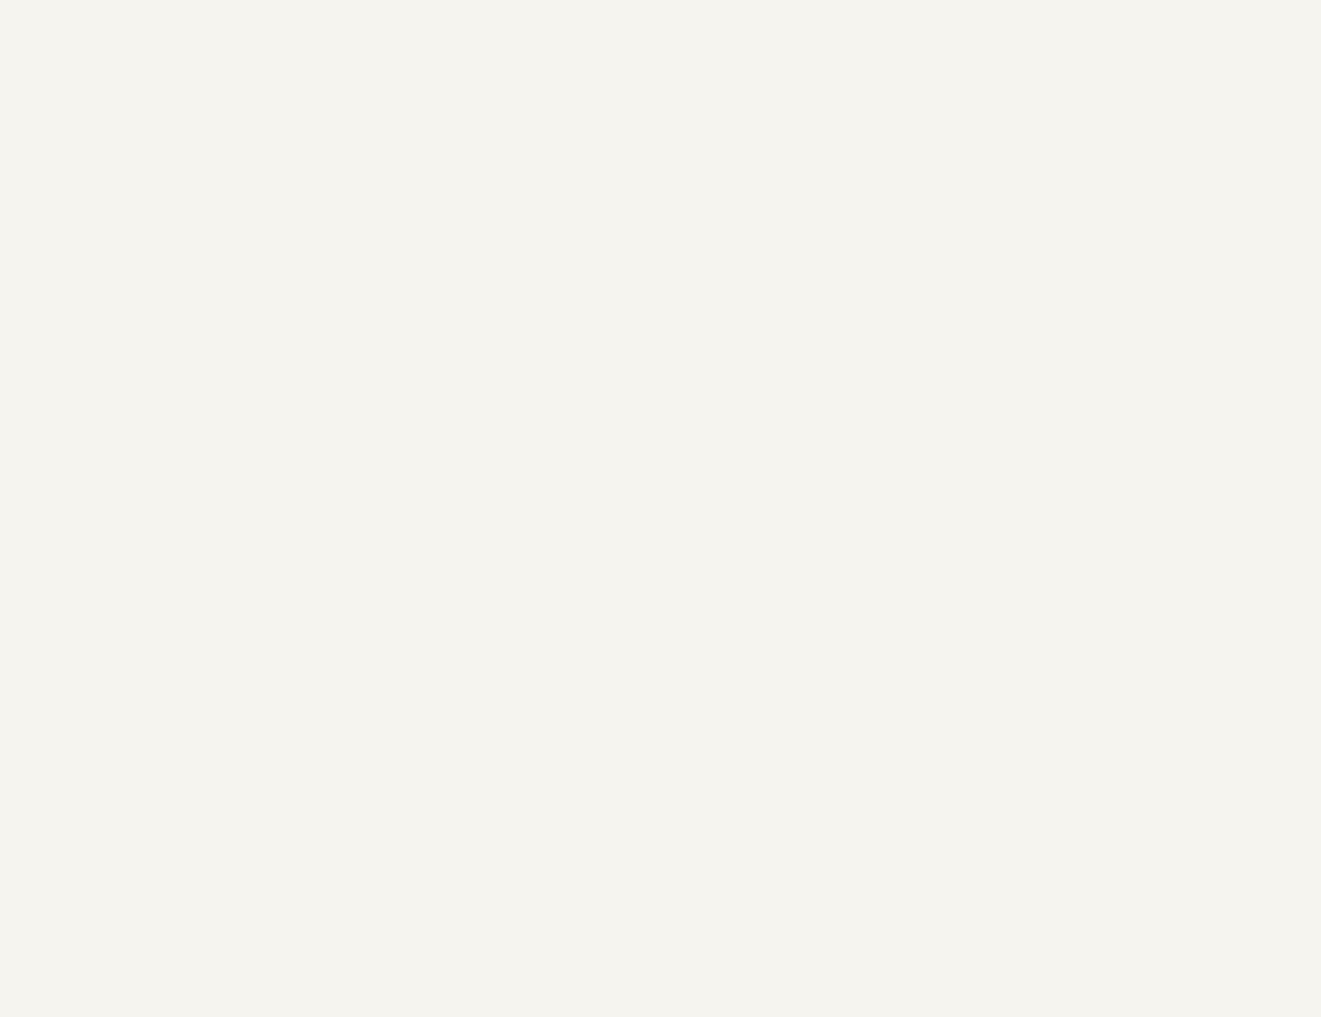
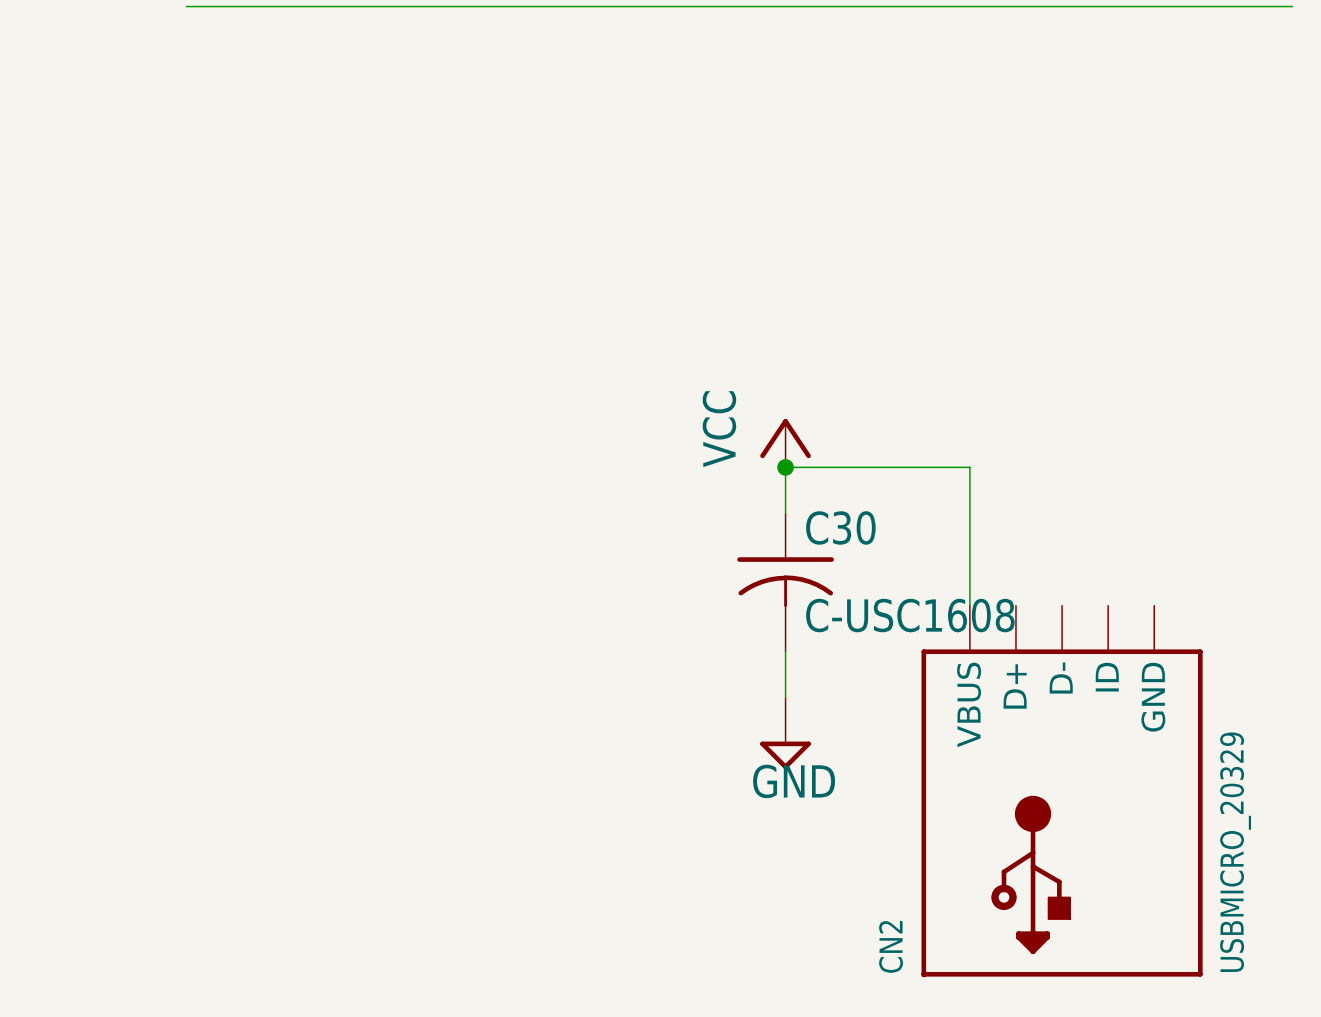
wire: none -> (186, 6) (1292, 6)
power symbol: none -> VCC (785, 443)
junction: none -> (785, 467)
wire: none -> (785, 513) (785, 467) (969, 467) (969, 605)
C30: none -> C-USC1608 (785, 582)
wire: none -> (785, 651) (785, 697)
power symbol: none -> GND (785, 733)
CN2: none -> USBMICRO_20329 (1062, 791)

